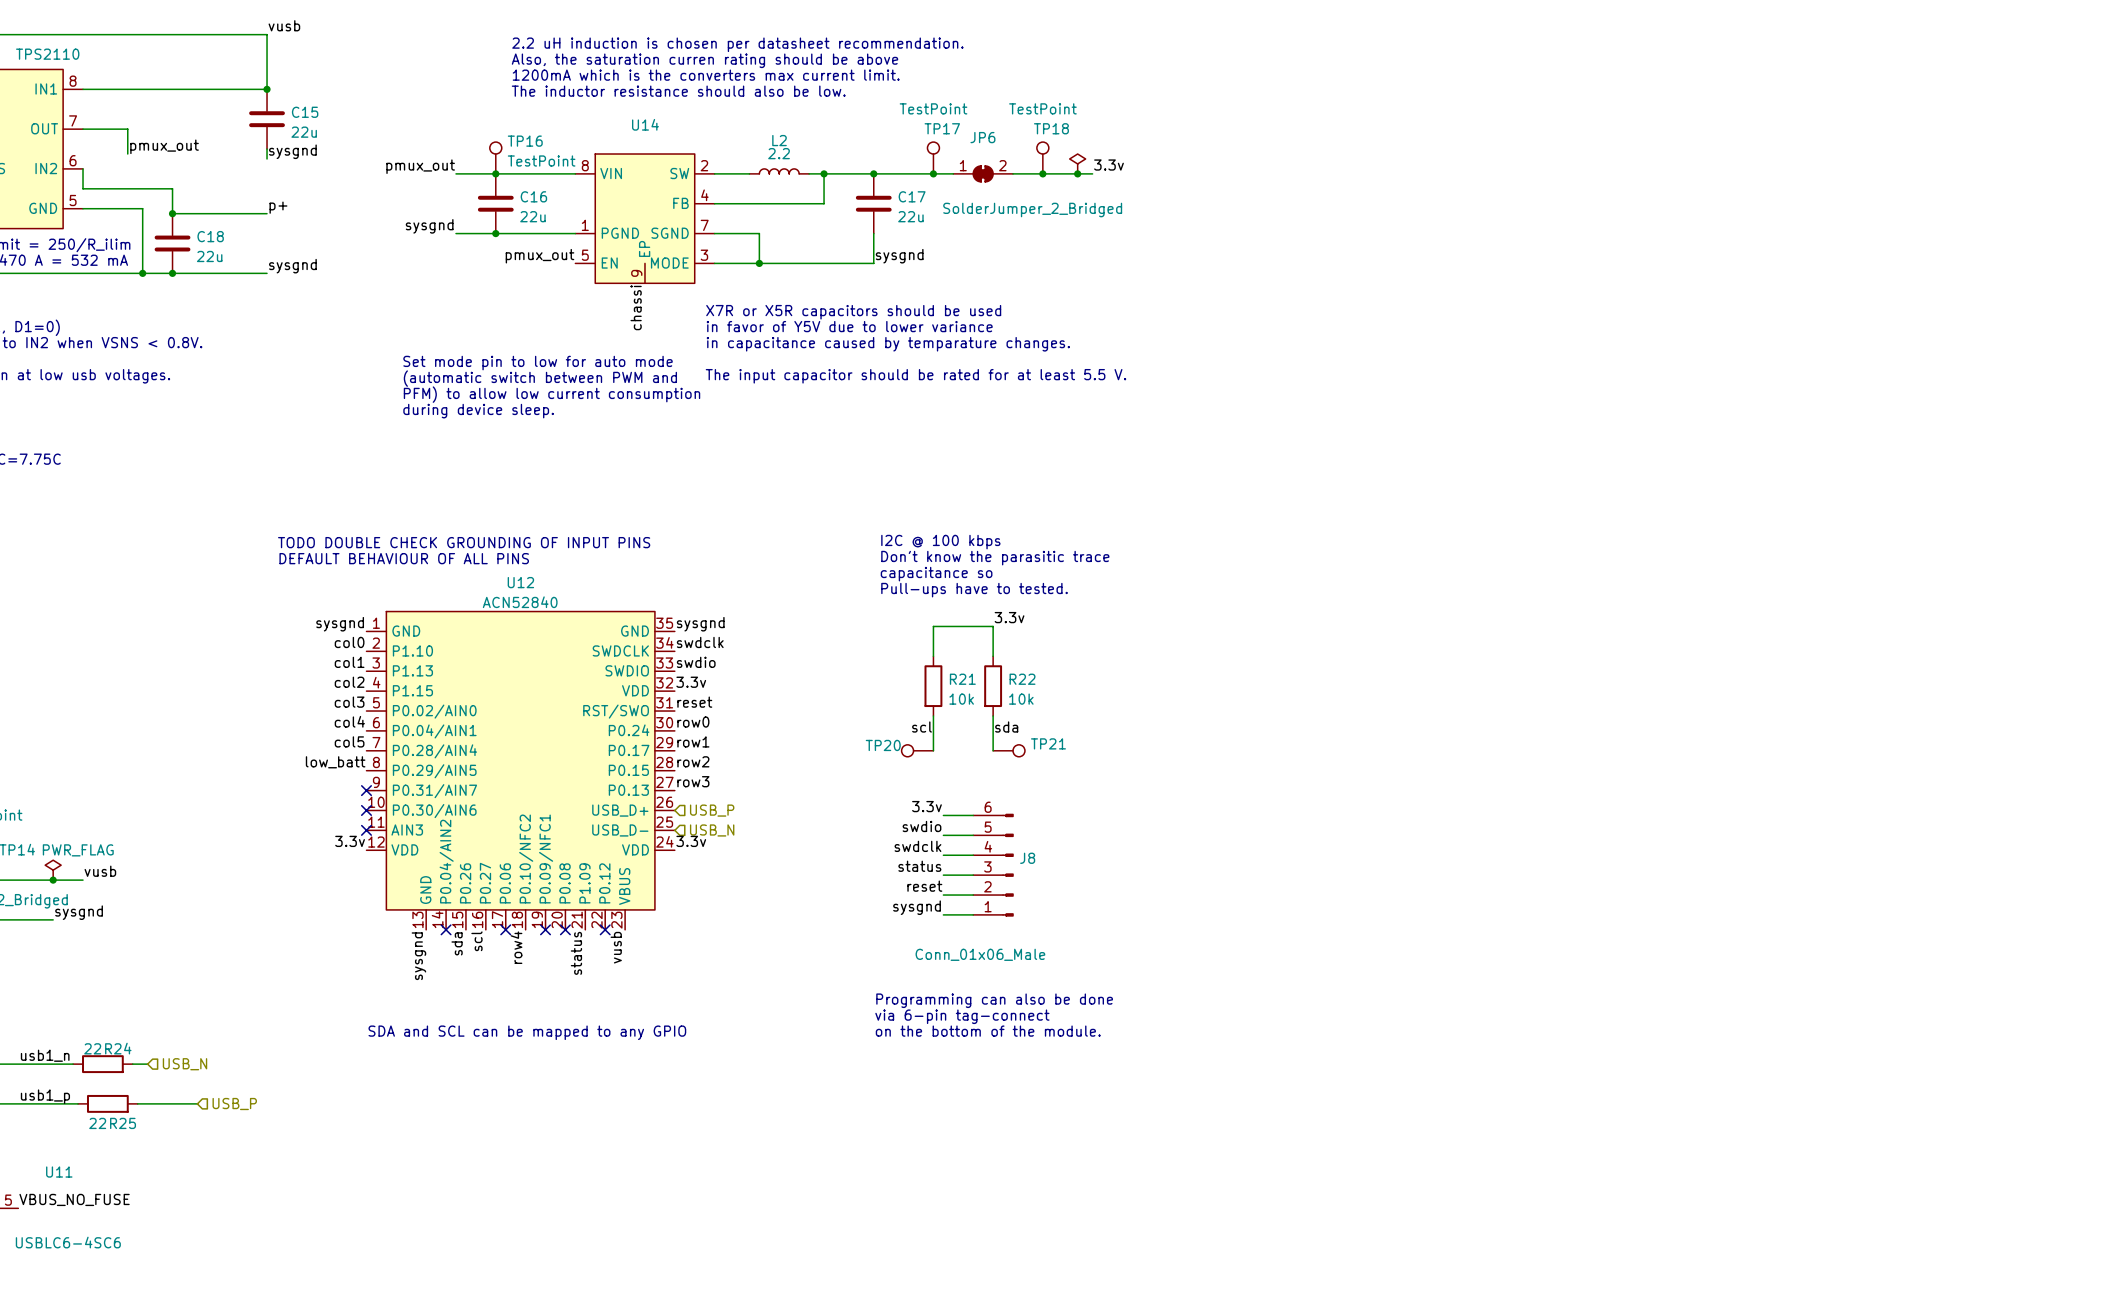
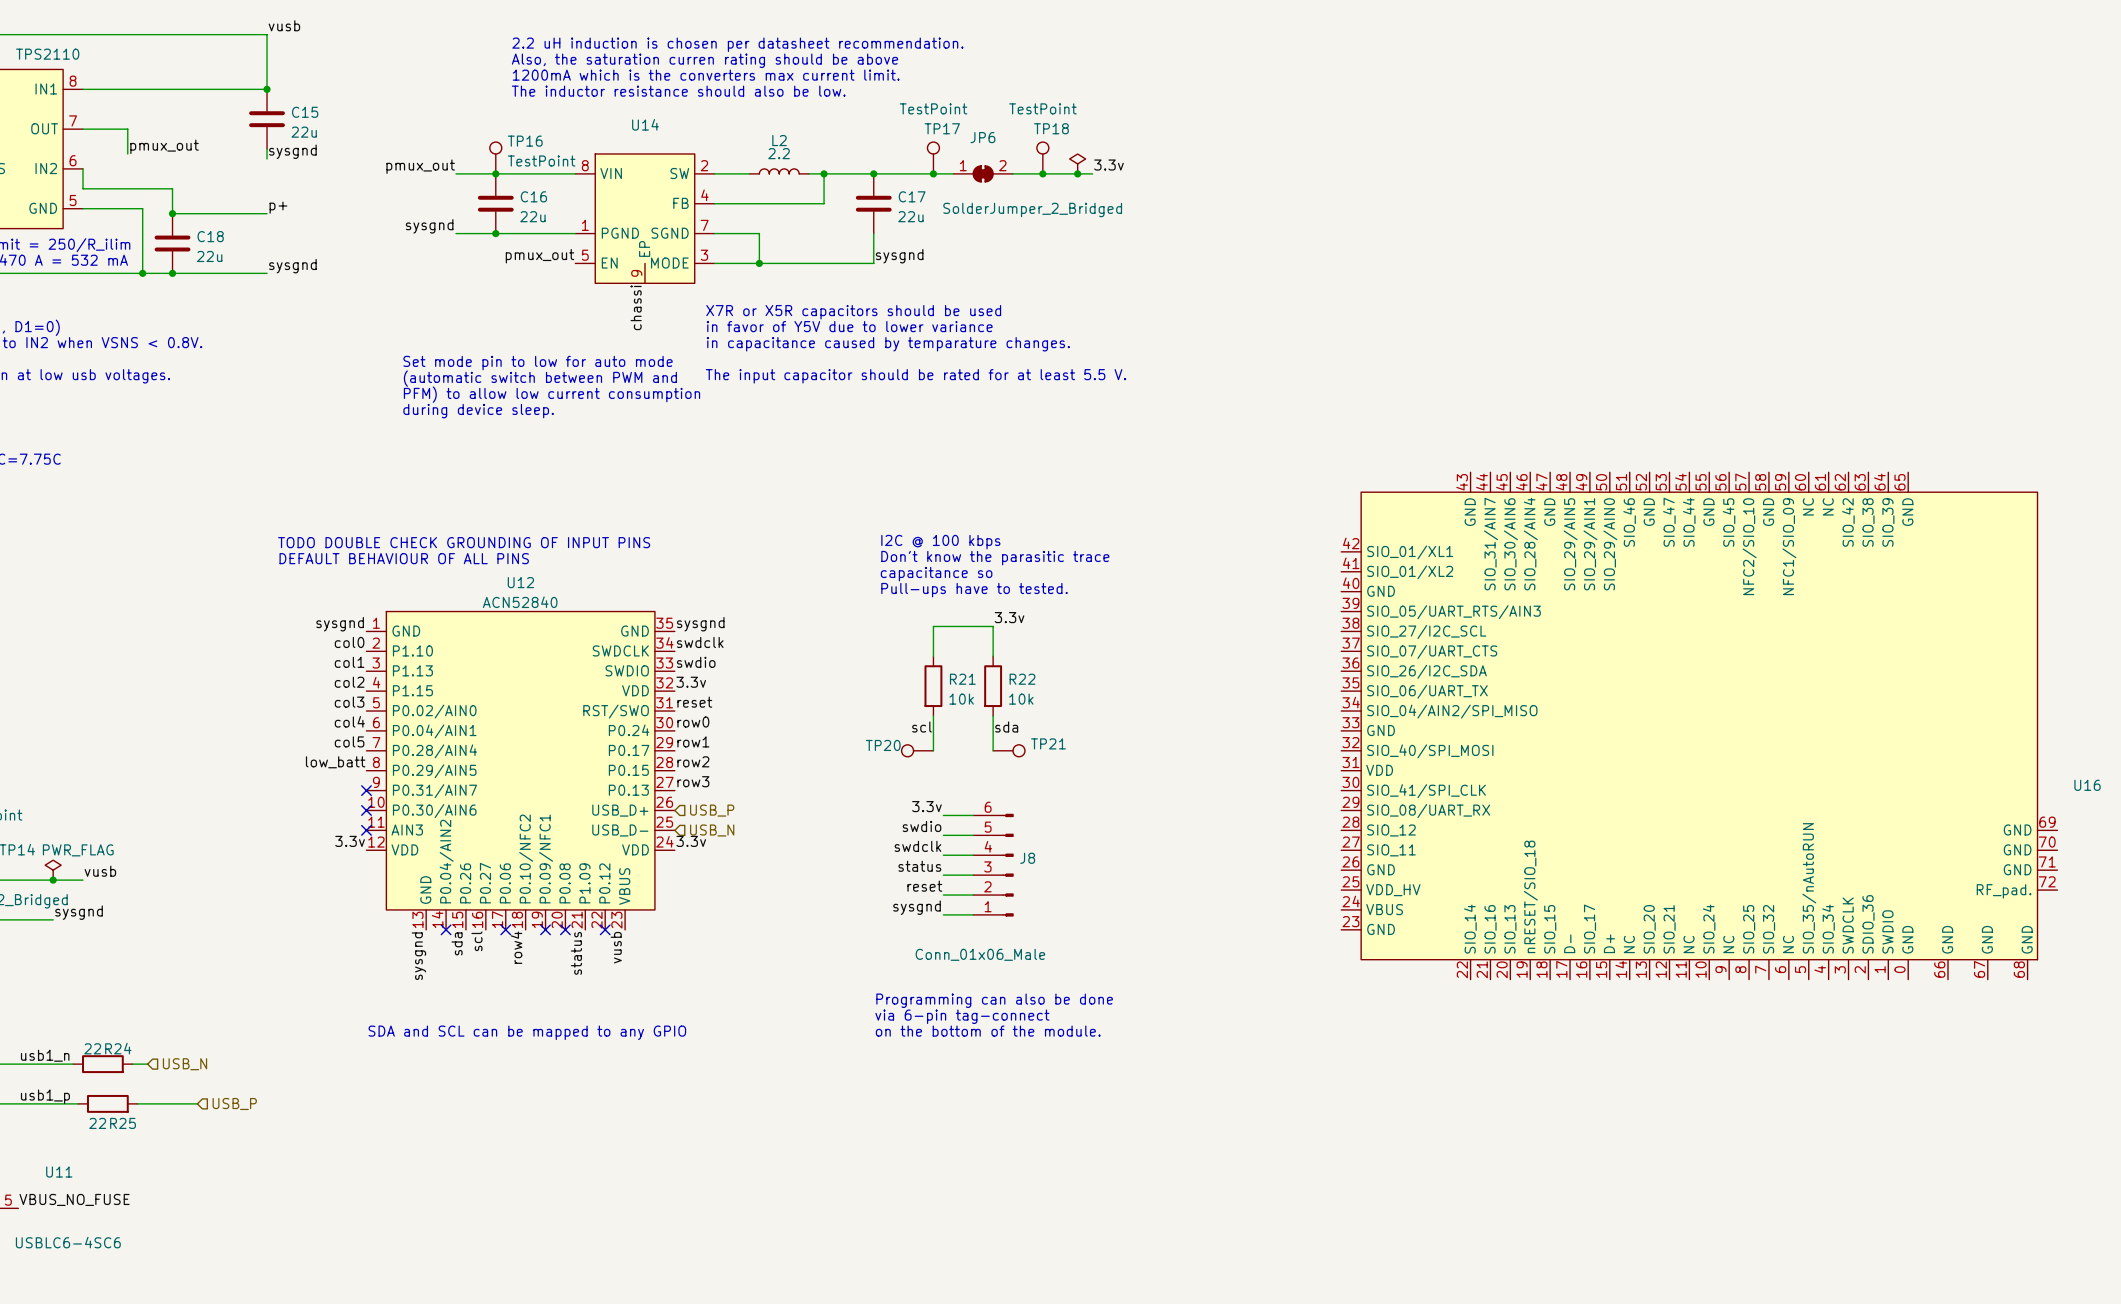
U16: none -> (1699, 725)

